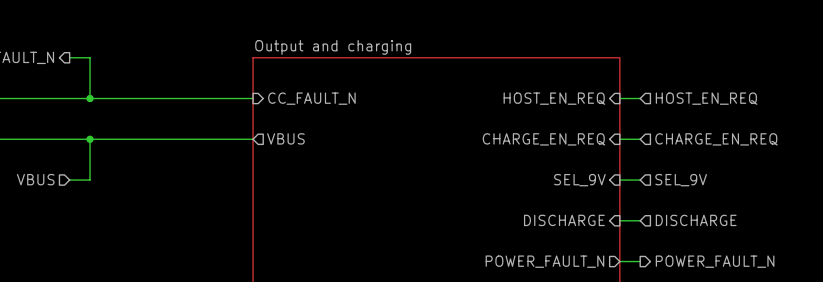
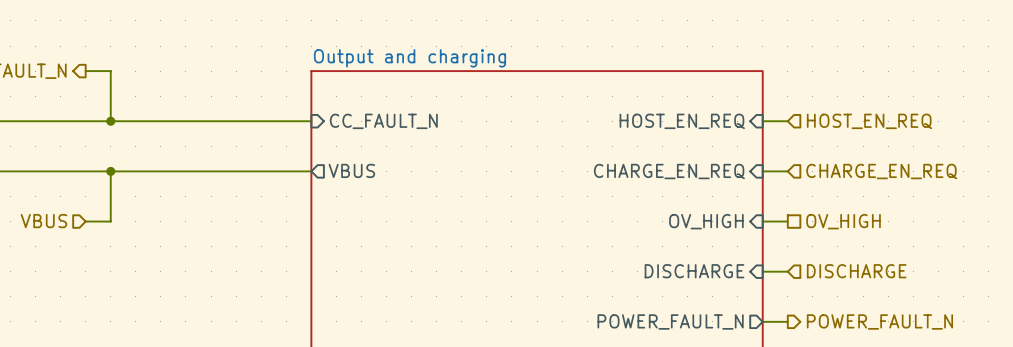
sheet pin: SEL_9V (579, 180) -> OV_HIGH (706, 221)
hierarchical label shape: input (681, 180) -> passive (843, 221)
hierarchical label: SEL_9V (681, 180) -> OV_HIGH (843, 221)

